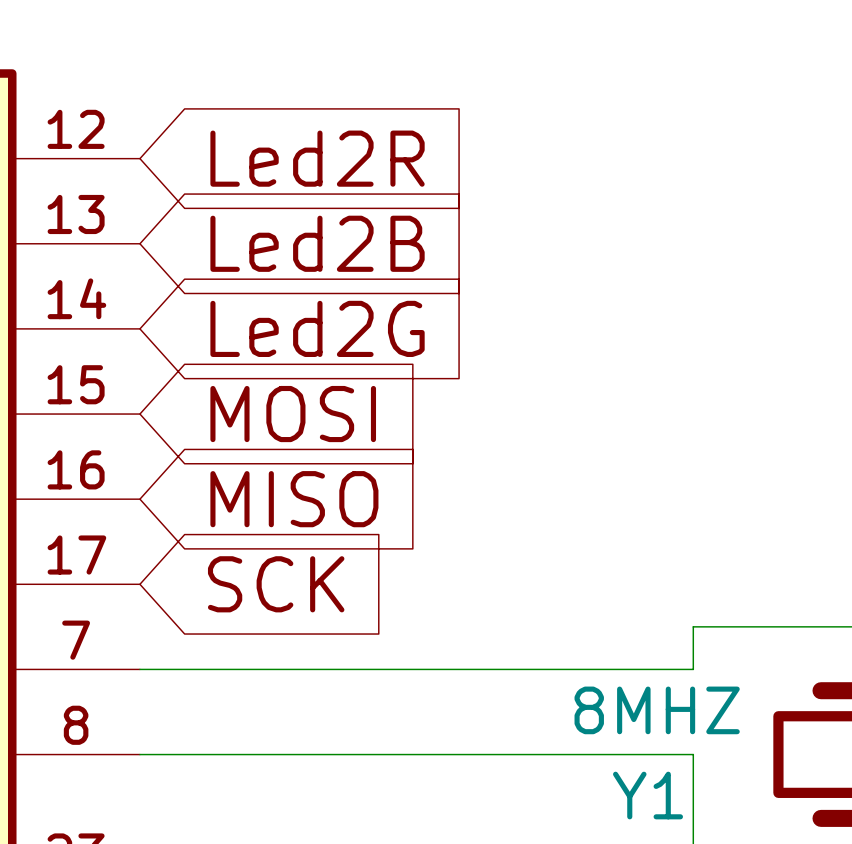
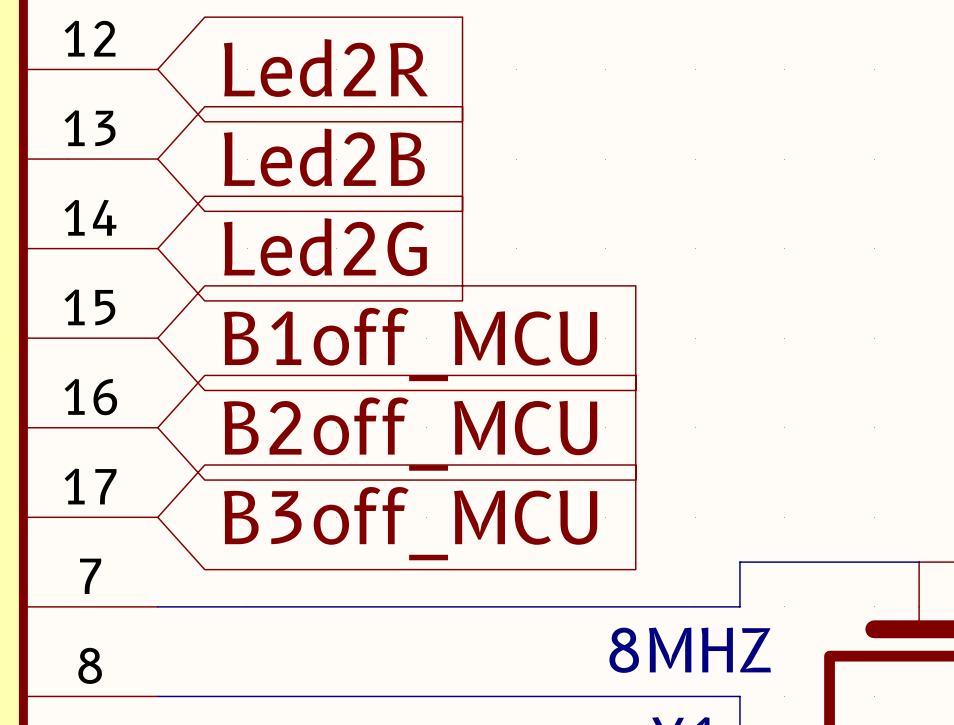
global label: MOSI (293, 414) -> B1off_MCU (410, 344)
global label: MISO (294, 499) -> B2off_MCU (410, 434)
global label: SCK (276, 584) -> B3off_MCU (410, 523)

